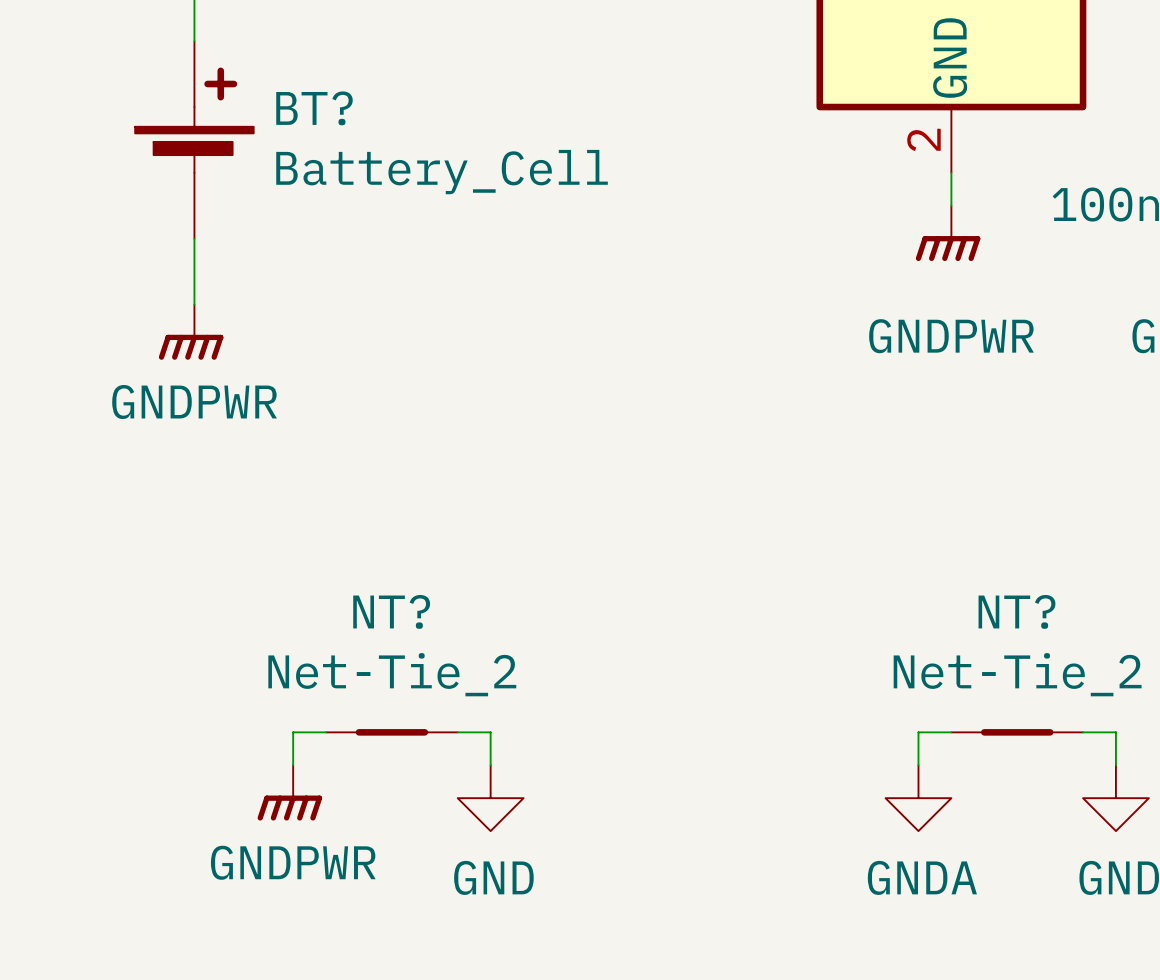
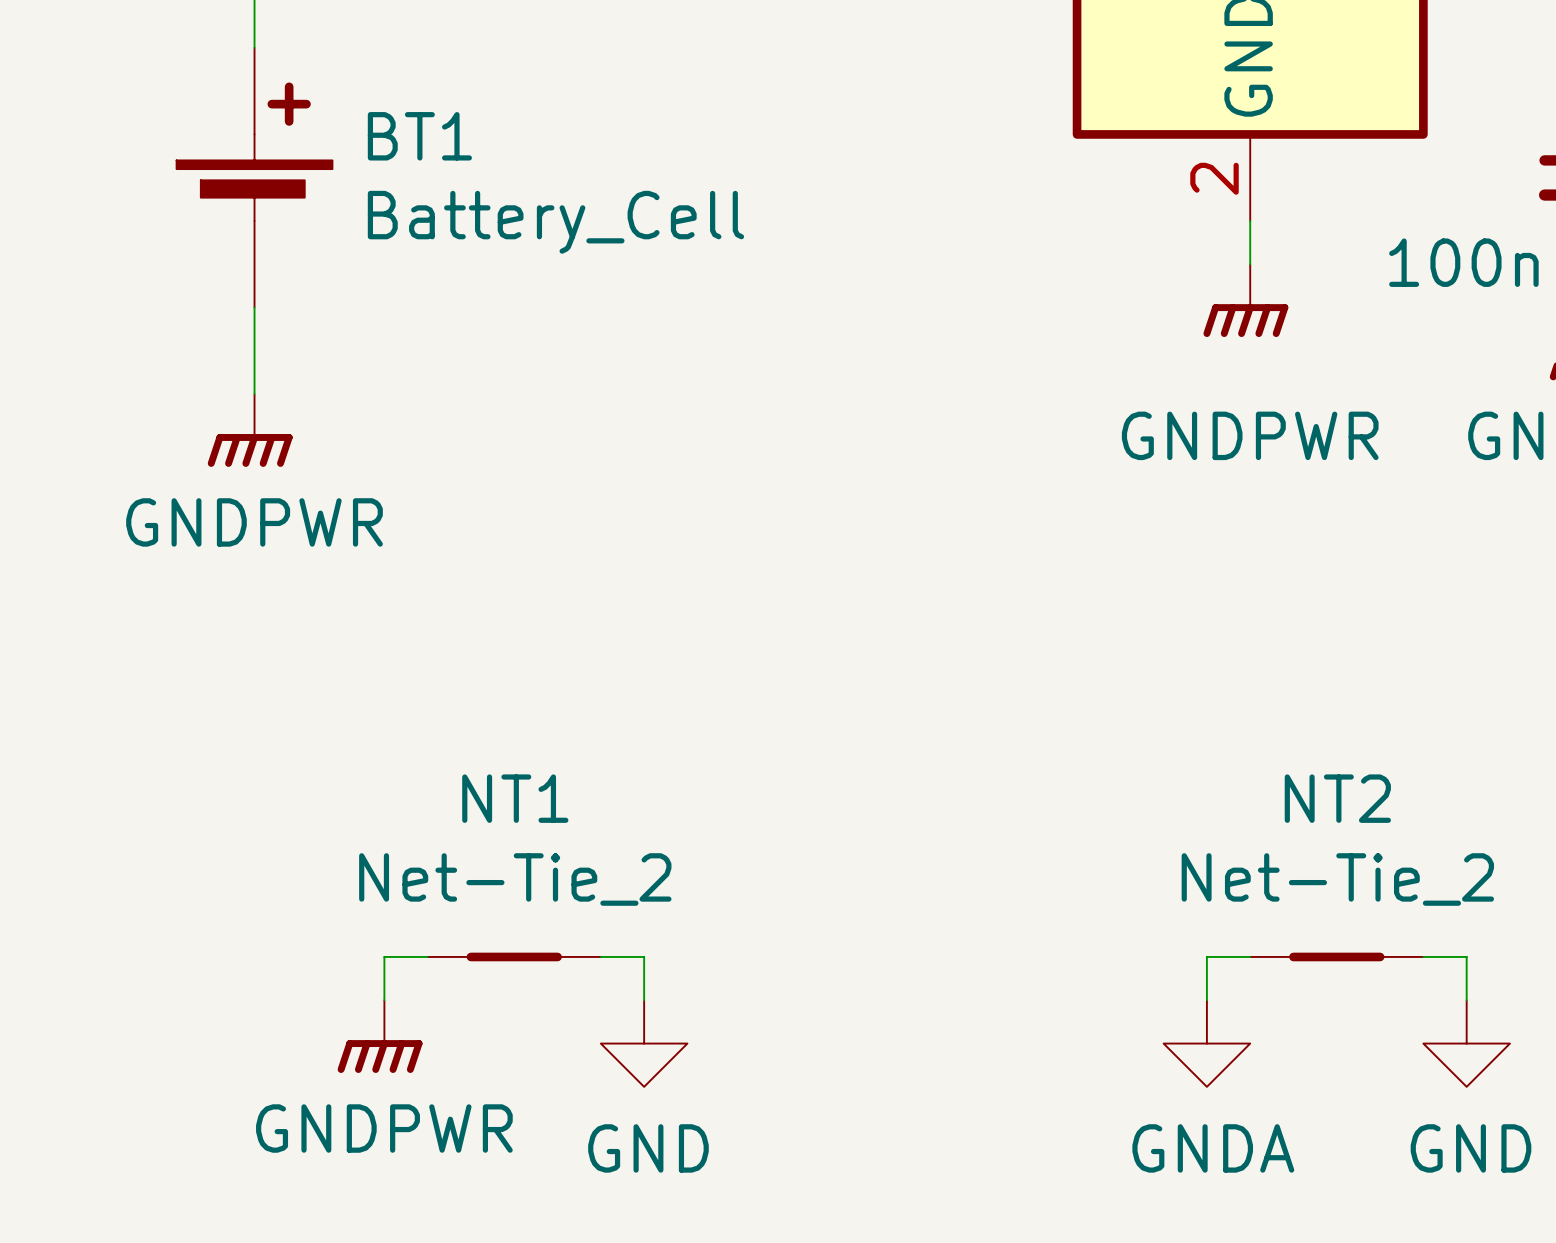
BT? name: BT? (314, 108) -> BT1 (419, 136)
NT? name: NT? (391, 611) -> NT1 (515, 798)
NT? name: NT? (1016, 611) -> NT2 (1337, 798)

